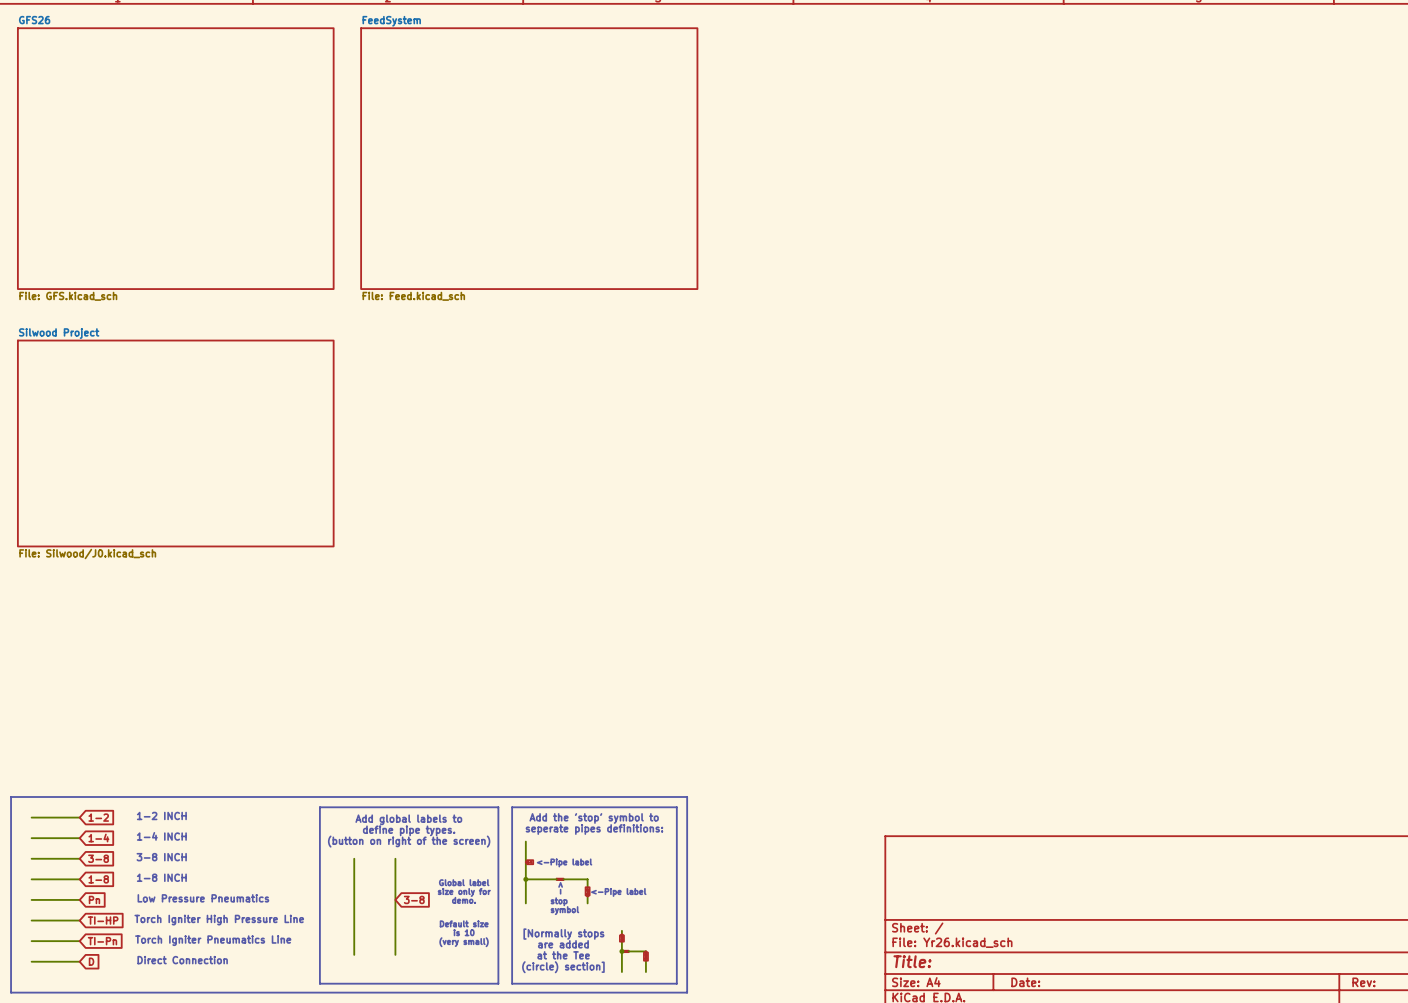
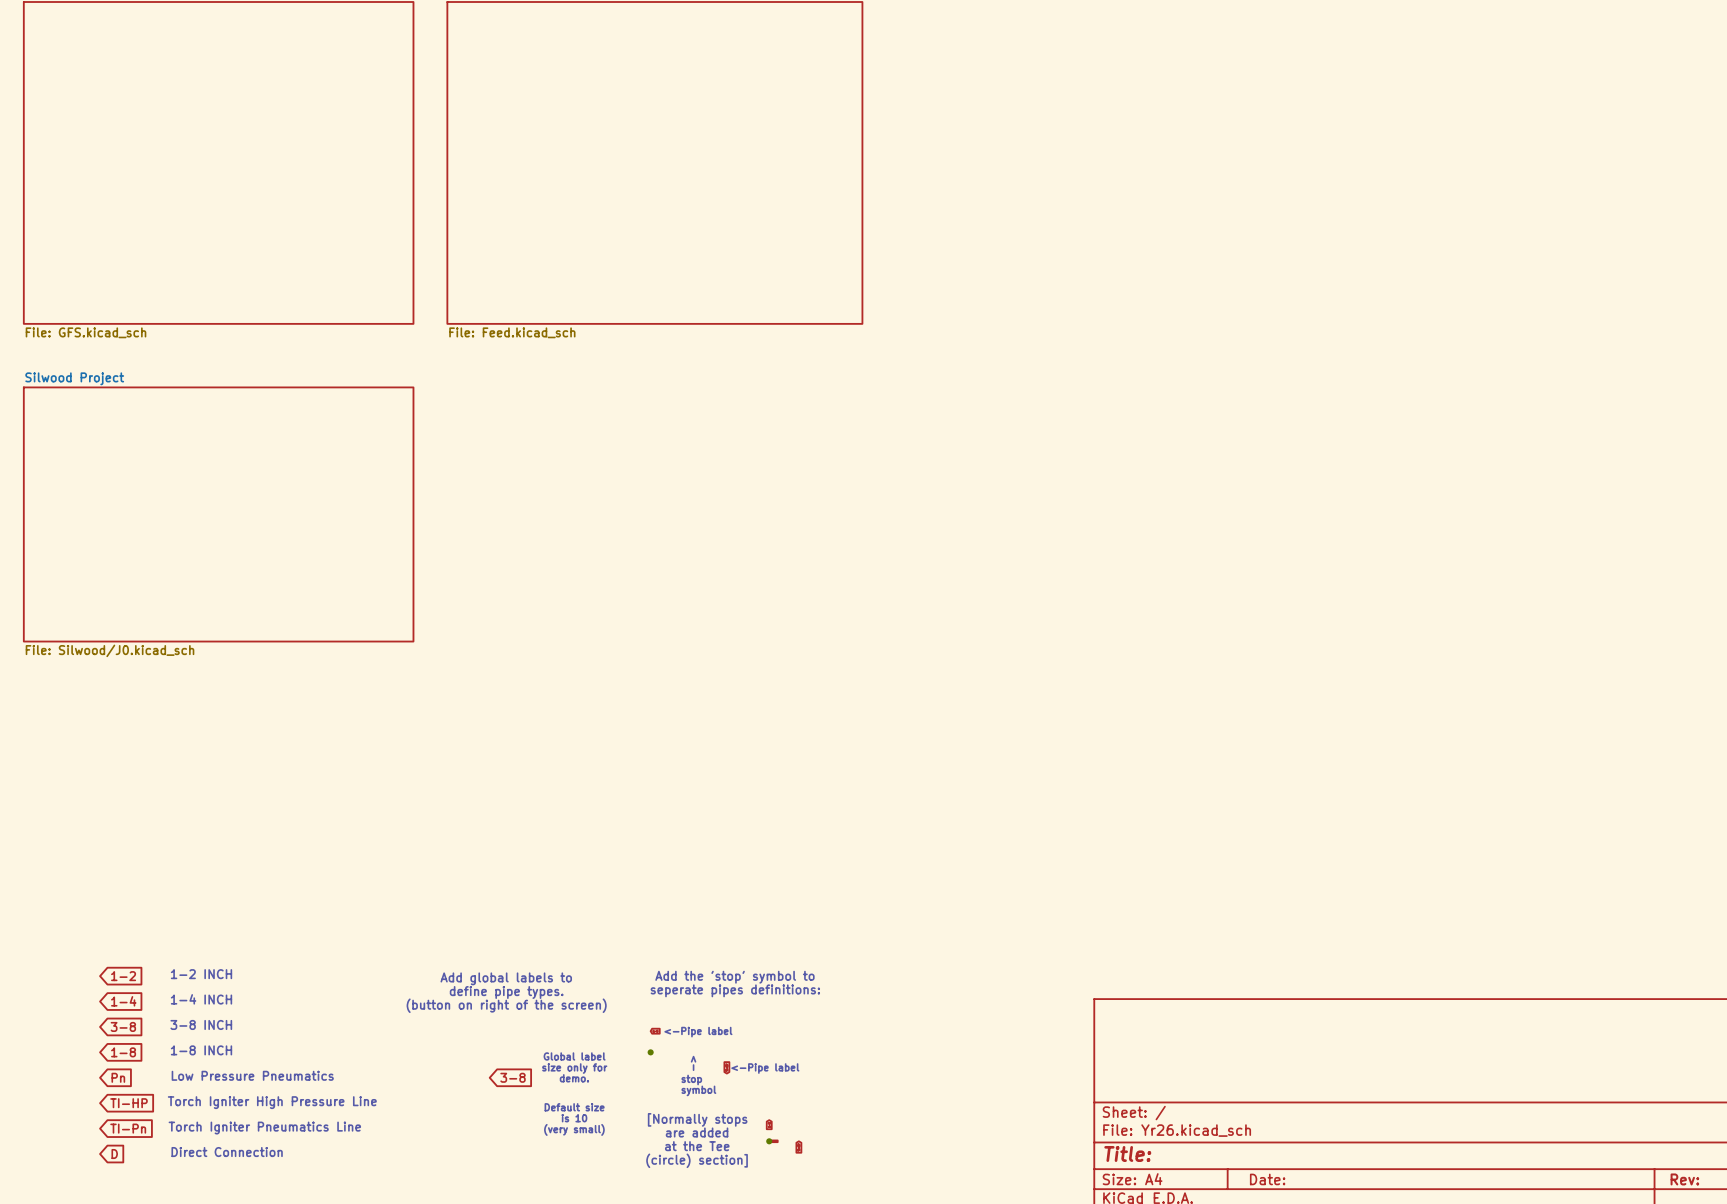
line: (11, 796) (687, 796) (687, 992) (11, 992) (11, 796) -> none
line: (319, 807) (498, 807) (498, 983) (319, 983) (319, 807) -> none
line: (512, 807) (676, 807) (676, 983) (512, 983) (512, 807) -> none
wire: (31, 817) (79, 817) -> none
wire: (31, 838) (79, 838) -> none
wire: (525, 841) (525, 903) -> none
wire: (31, 858) (79, 858) -> none
wire: (354, 858) (354, 954) -> none
wire: (395, 858) (395, 954) -> none
wire: (31, 879) (79, 879) -> none
wire: (525, 879) (556, 879) -> none
part: (560, 879) -> none
wire: (563, 879) (587, 879) (587, 903) -> none
wire: (31, 899) (79, 899) -> none
wire: (31, 920) (79, 920) -> none
wire: (621, 930) (621, 972) -> none
wire: (31, 941) (79, 941) -> none
wire: (628, 951) (645, 951) (645, 972) -> none
wire: (31, 961) (79, 961) -> none

